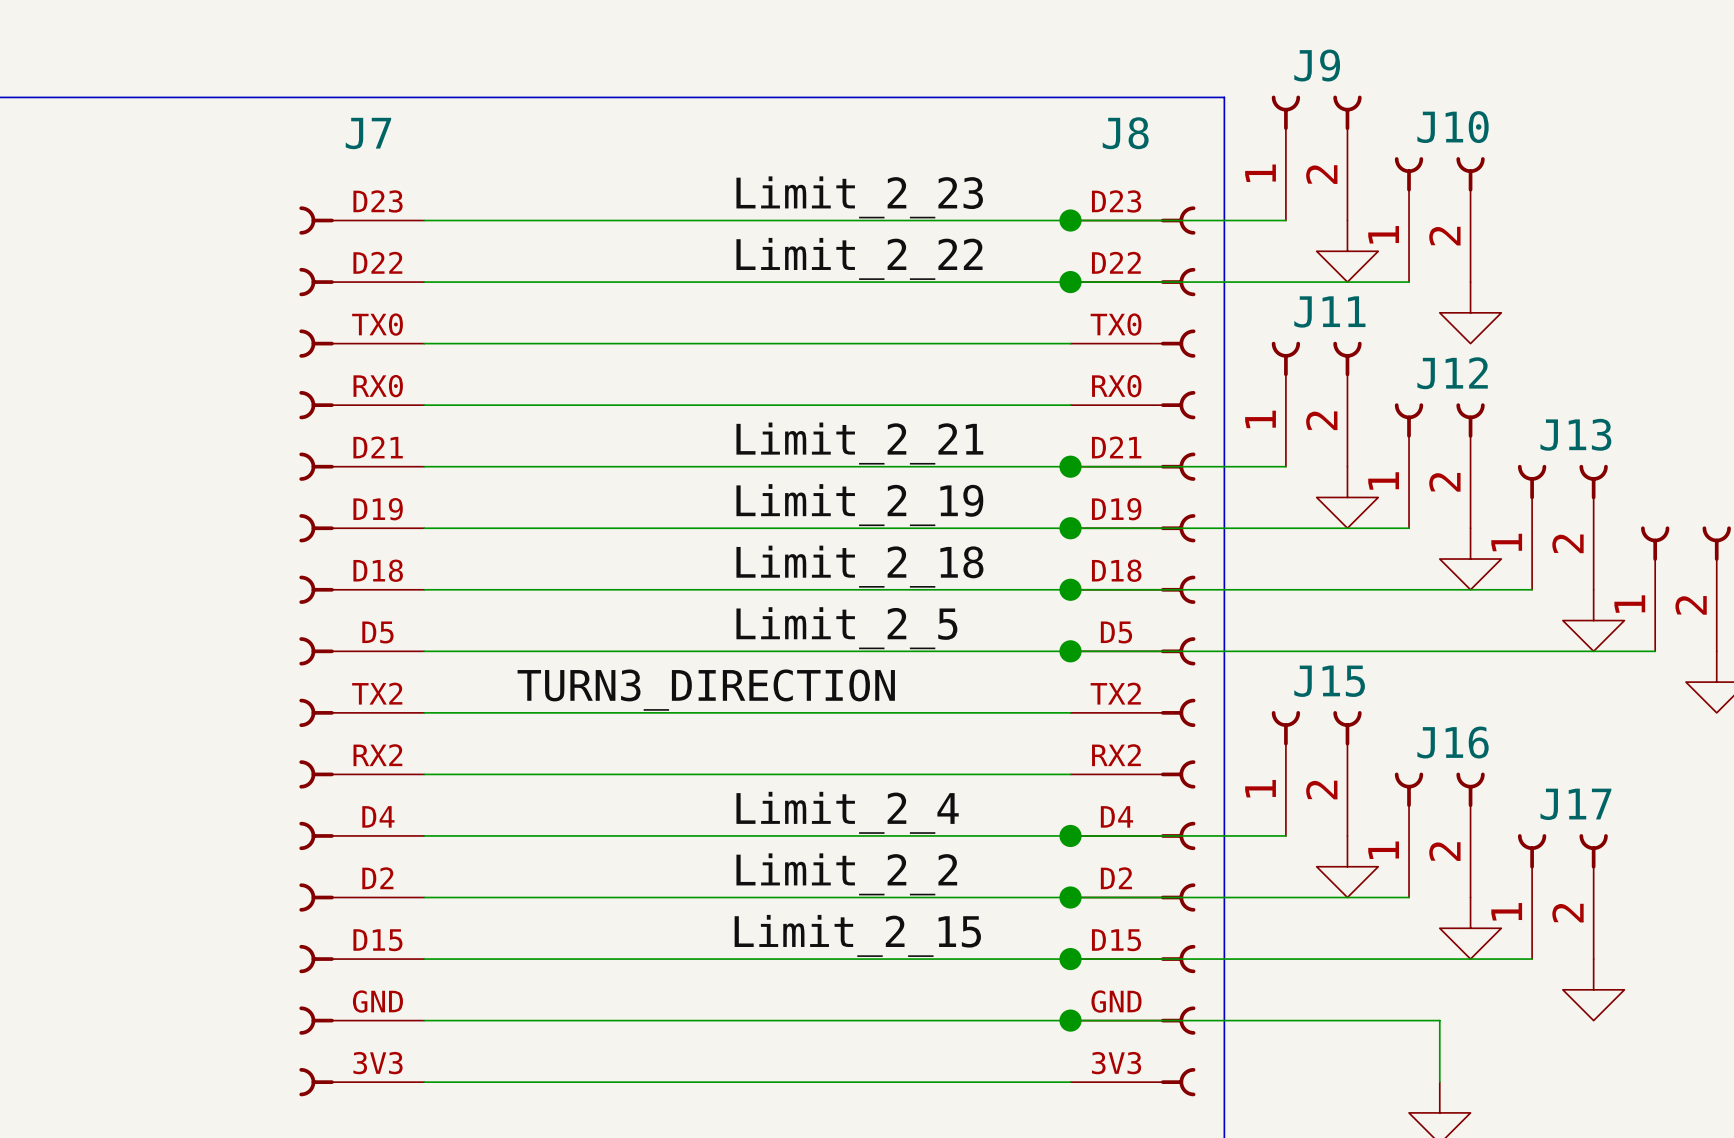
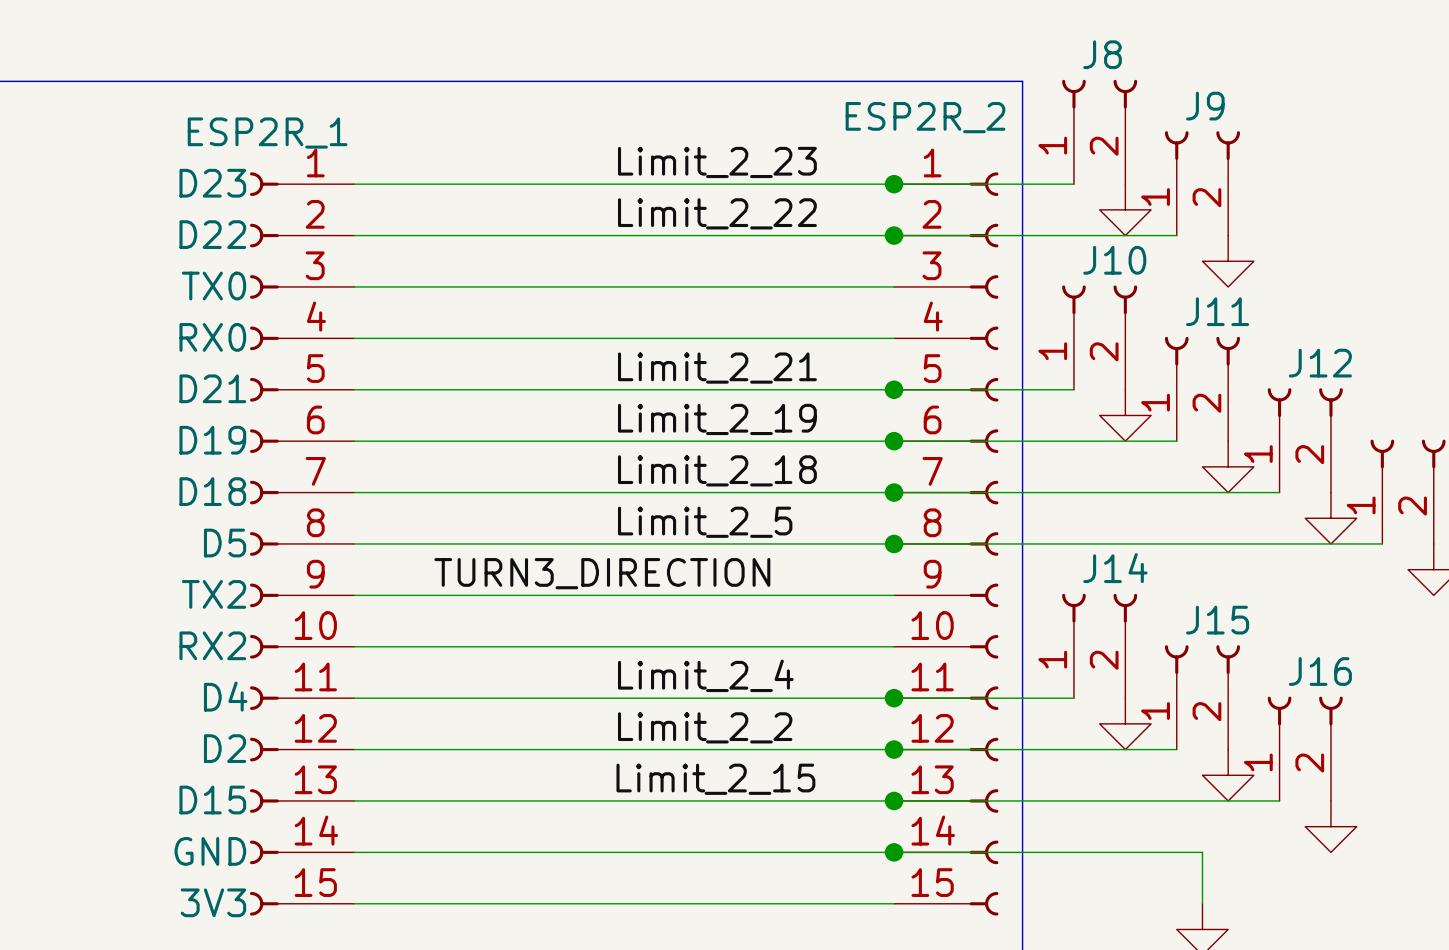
J9 name: J9 (1317, 65) -> J8 (1102, 54)
J10 name: J10 (1453, 127) -> J9 (1205, 106)
J7 name: J7 (368, 133) -> ESP2R_1 (267, 133)
J8 name: J8 (1125, 133) -> ESP2R_2 (925, 117)
J7 symbol: [299, 206, 425, 1097] -> [250, 172, 355, 916]
J8 symbol: [1070, 206, 1196, 1097] -> [894, 172, 999, 916]
J11 name: J11 (1329, 311) -> J10 (1114, 260)
J12 name: J12 (1452, 373) -> J11 (1217, 311)
J13 name: J13 (1575, 434) -> J12 (1320, 363)
J15 name: J15 (1329, 681) -> J14 (1115, 568)
J16 name: J16 (1453, 742) -> J15 (1217, 620)
J17 name: J17 (1575, 804) -> J16 (1320, 671)

